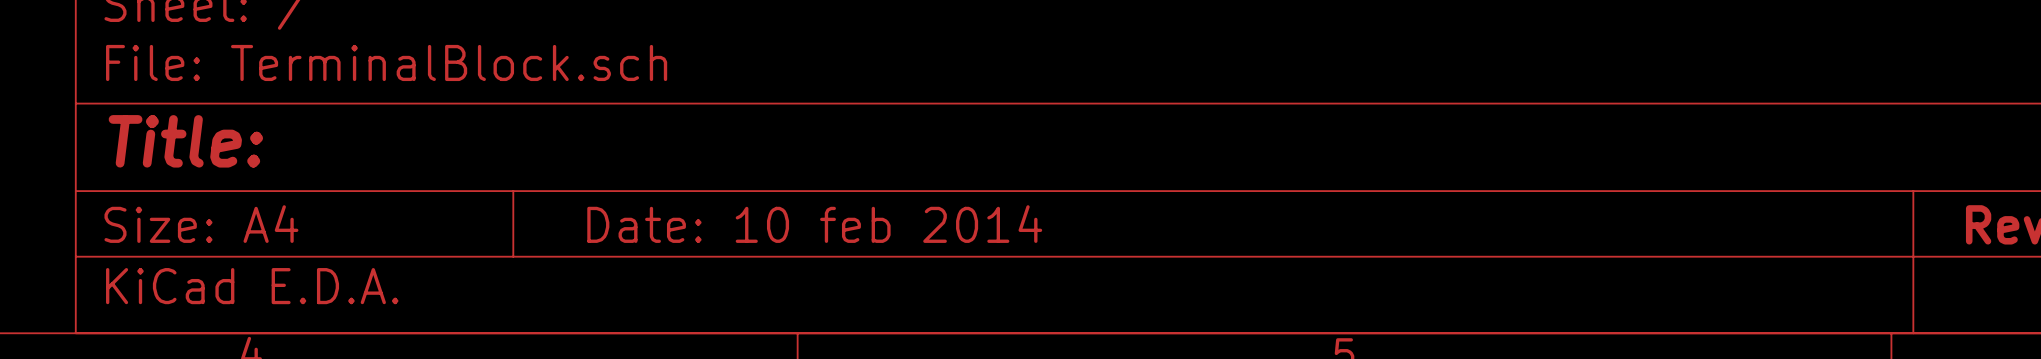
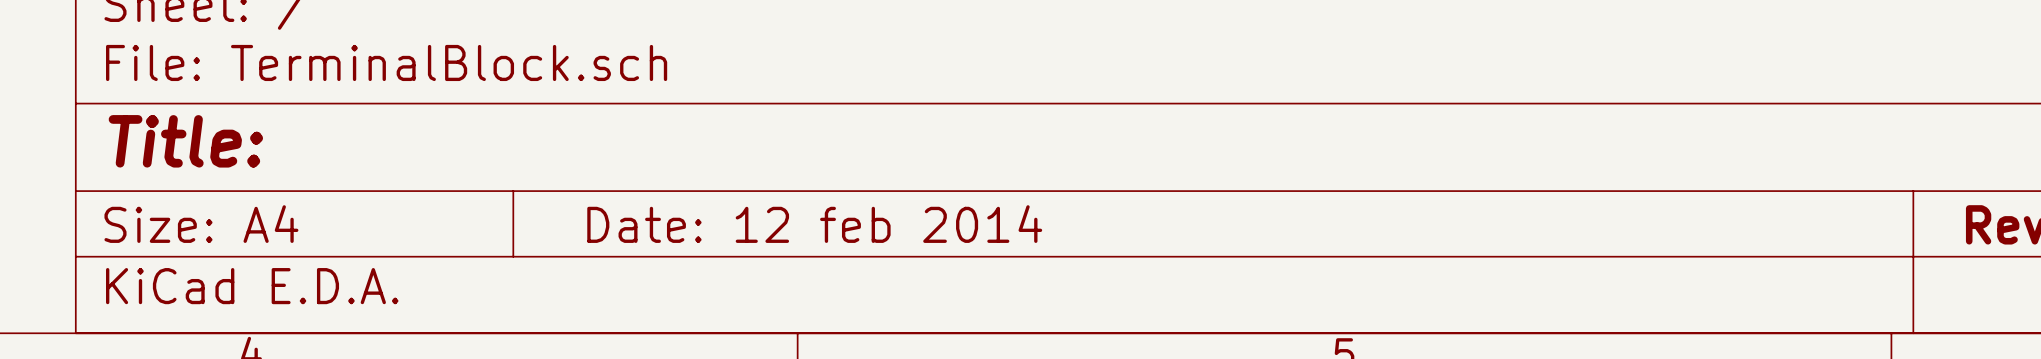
title block: Date: 10 feb 2014 (814, 224) -> Date: 12 feb 2014 (814, 224)

